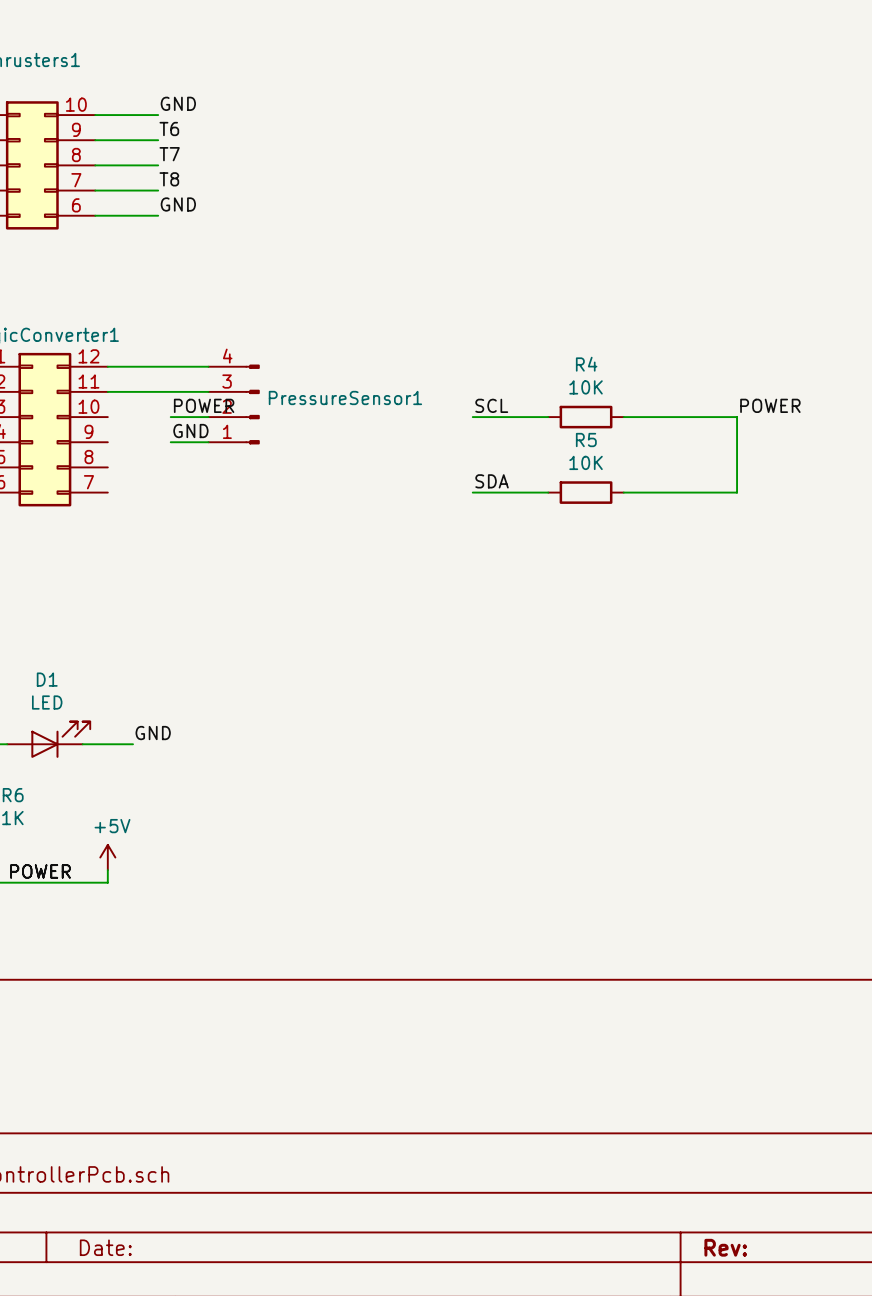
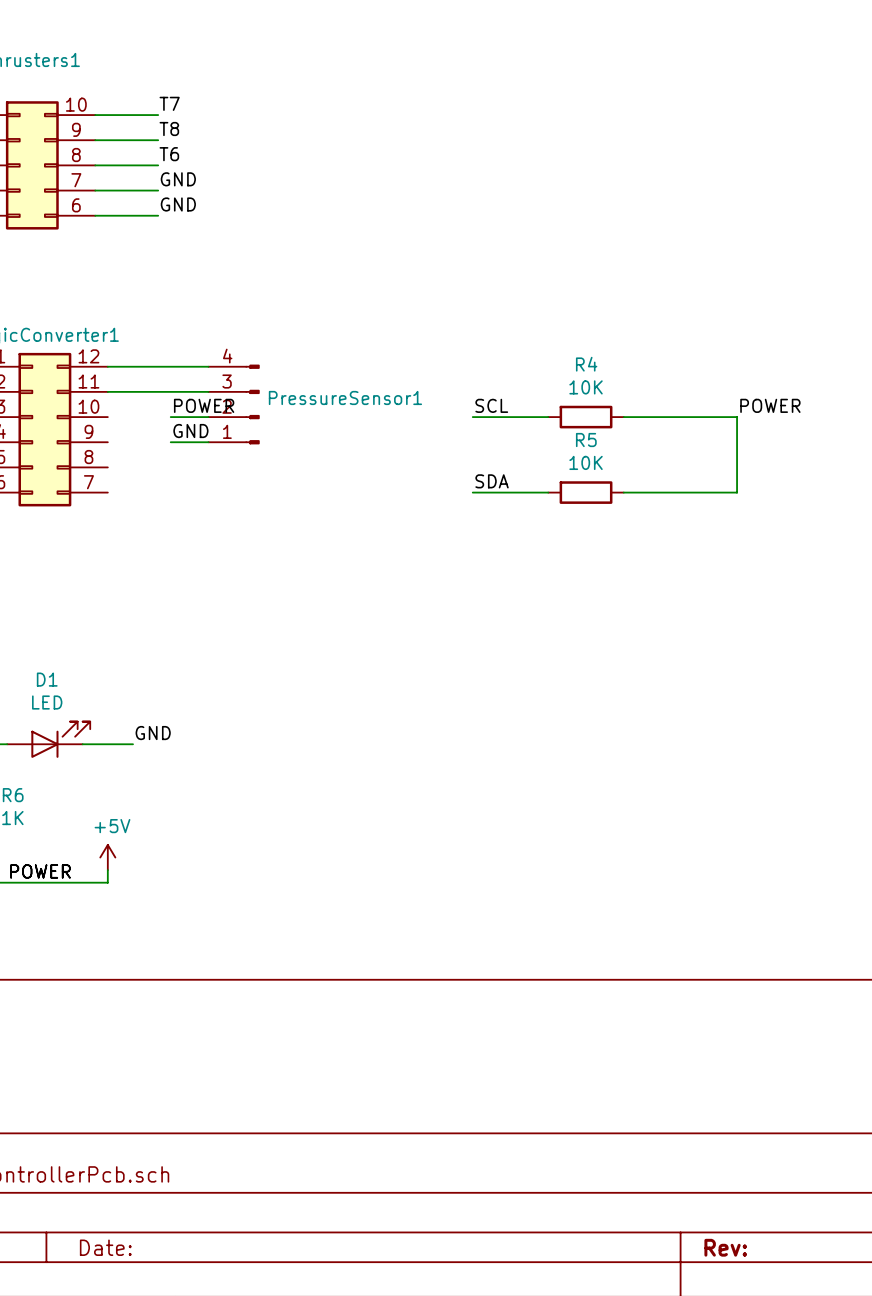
label: GND (178, 103) -> T7 (169, 103)
label: T6 (169, 128) -> T8 (169, 128)
label: T7 (169, 154) -> T6 (169, 154)
label: T8 (169, 179) -> GND (178, 179)

